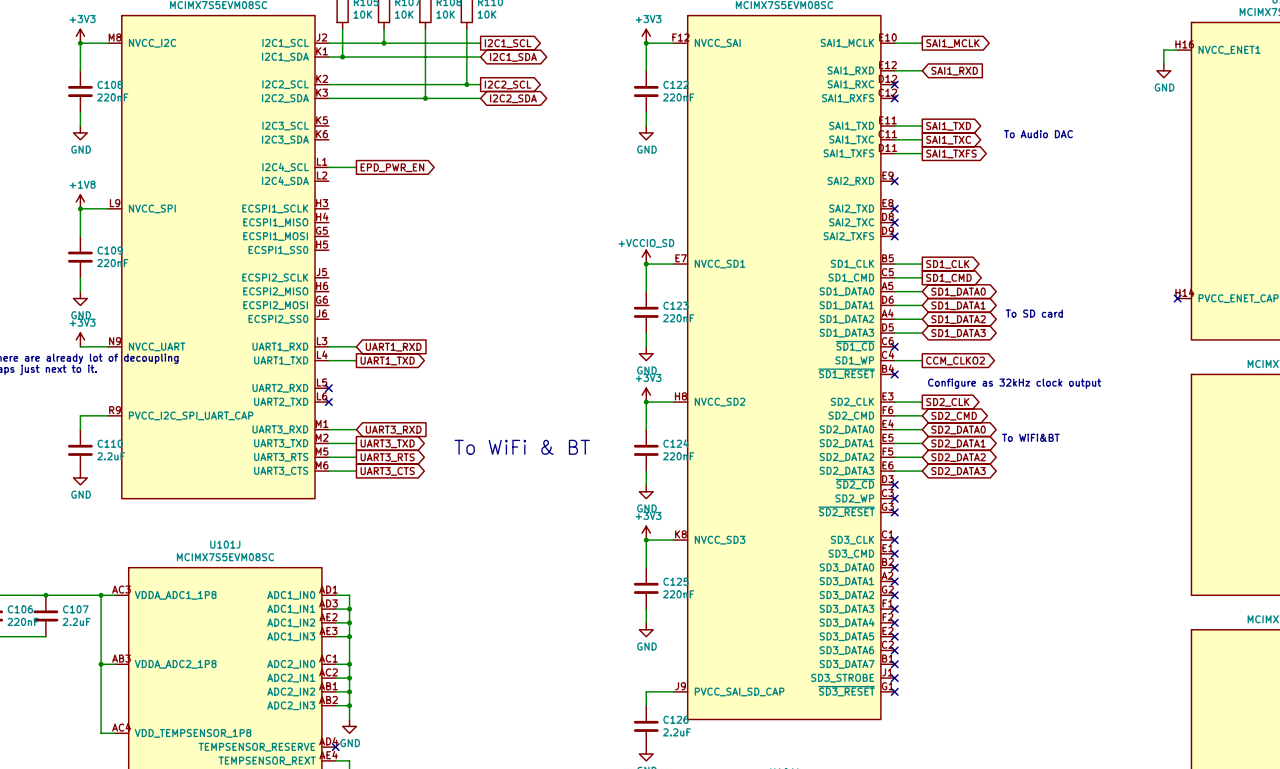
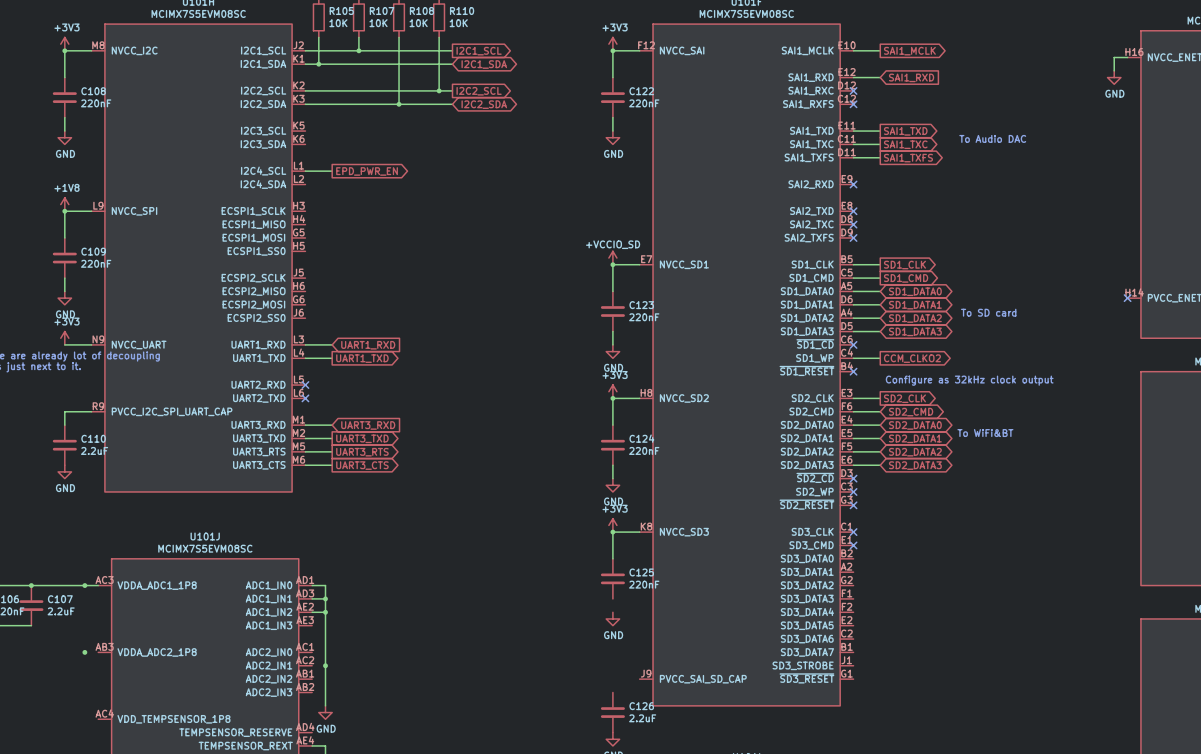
text: To WiFi & BT (522, 447) -> none
no-connect mark: (894, 567) -> none
no-connect mark: (894, 581) -> none
wire: (101, 595) (101, 733) (114, 733) -> none
no-connect mark: (894, 595) -> none
wire: (646, 609) (646, 622) -> none
no-connect mark: (894, 609) -> none
no-connect mark: (894, 622) -> none
wire: (335, 636) (349, 636) -> none
junction: (349, 636) -> none
no-connect mark: (894, 636) -> none
no-connect mark: (894, 650) -> none
wire: (101, 664) (114, 664) -> none
wire: (335, 664) (349, 664) -> none
junction: (349, 664) -> none
no-connect mark: (894, 664) -> none
wire: (335, 678) (349, 678) -> none
no-connect mark: (894, 678) -> none
wire: (335, 691) (349, 691) -> none
junction: (349, 691) -> none
wire: (673, 691) (646, 691) (646, 705) -> none
no-connect mark: (894, 691) -> none
wire: (335, 705) (349, 705) -> none
junction: (349, 705) -> none
no-connect mark: (335, 747) -> none

